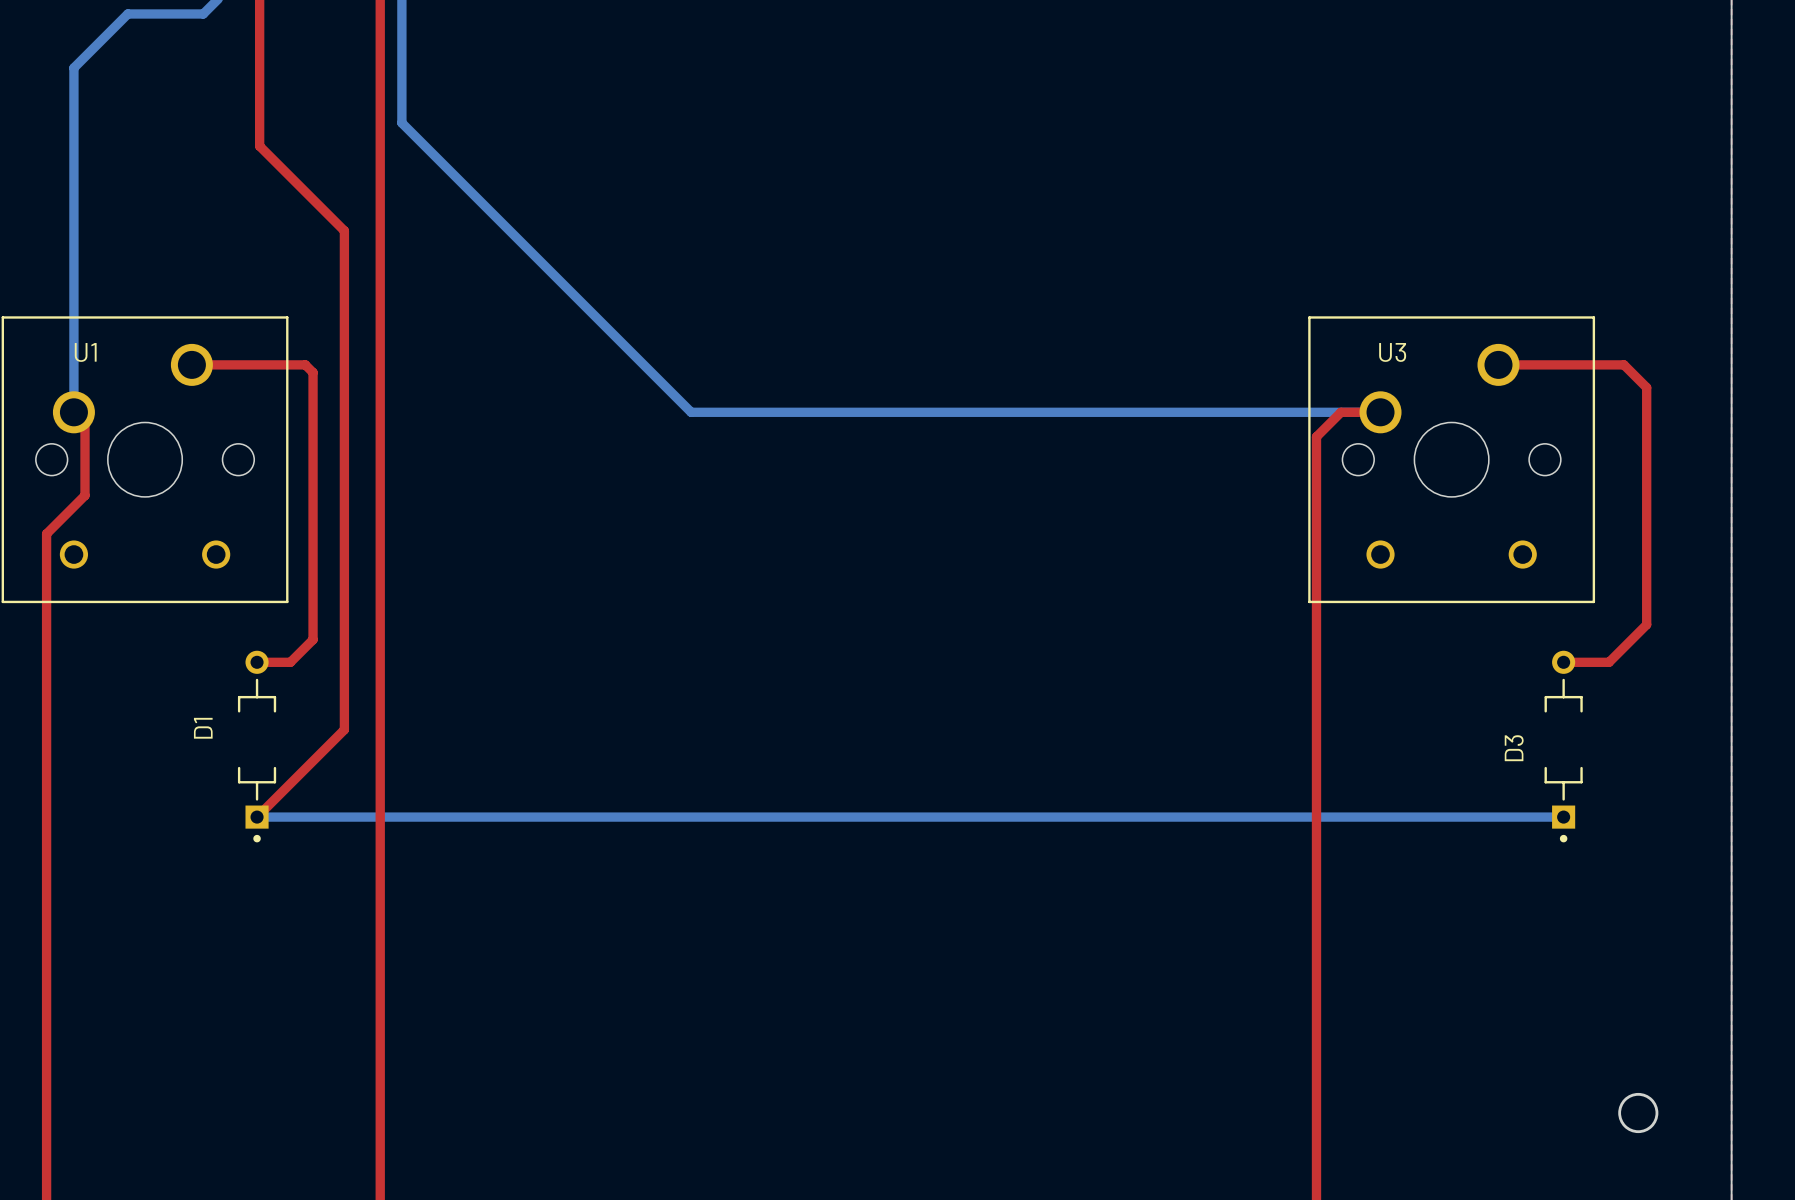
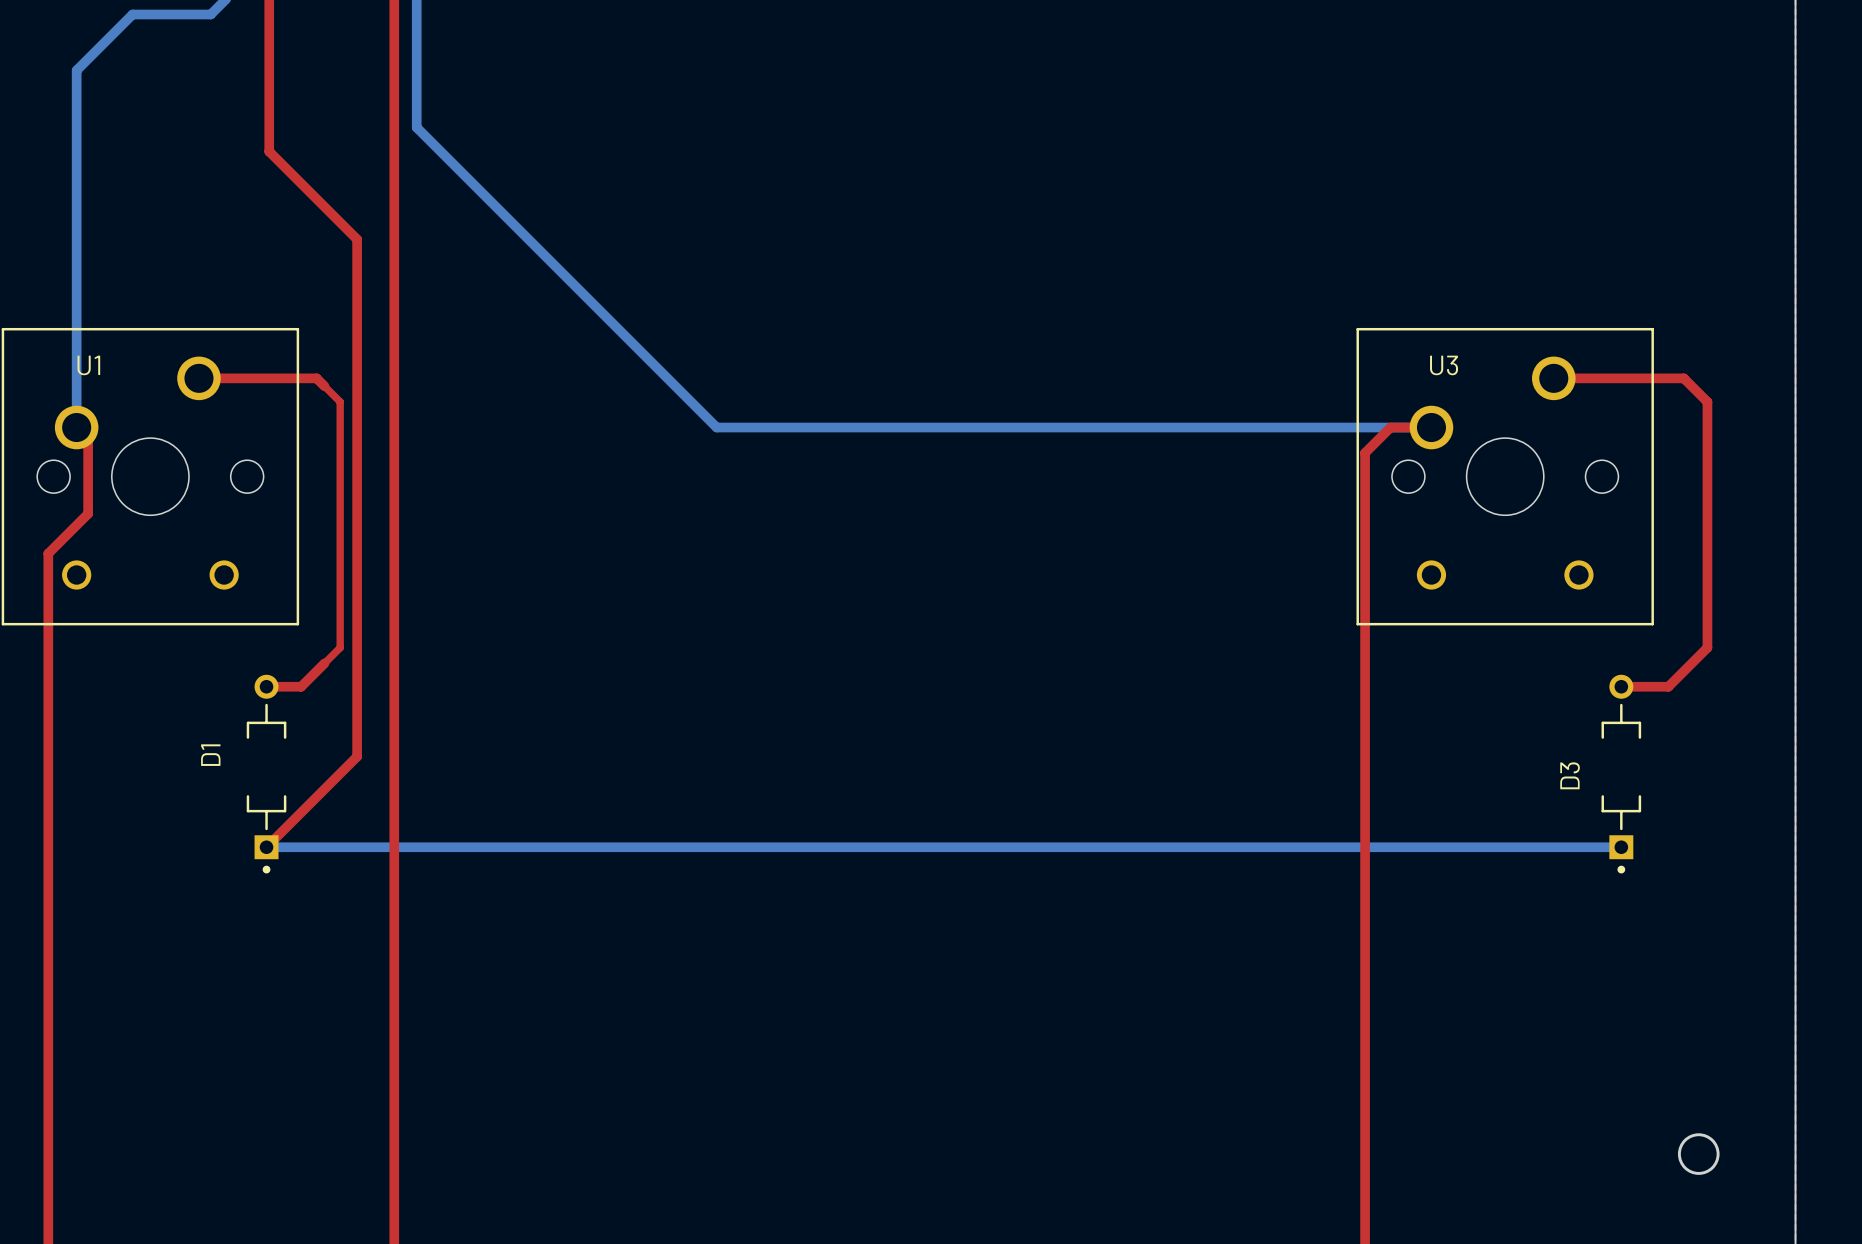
top track: (313, 372) (313, 639) -> (324, 386) (340, 401) (340, 647) (324, 663)

